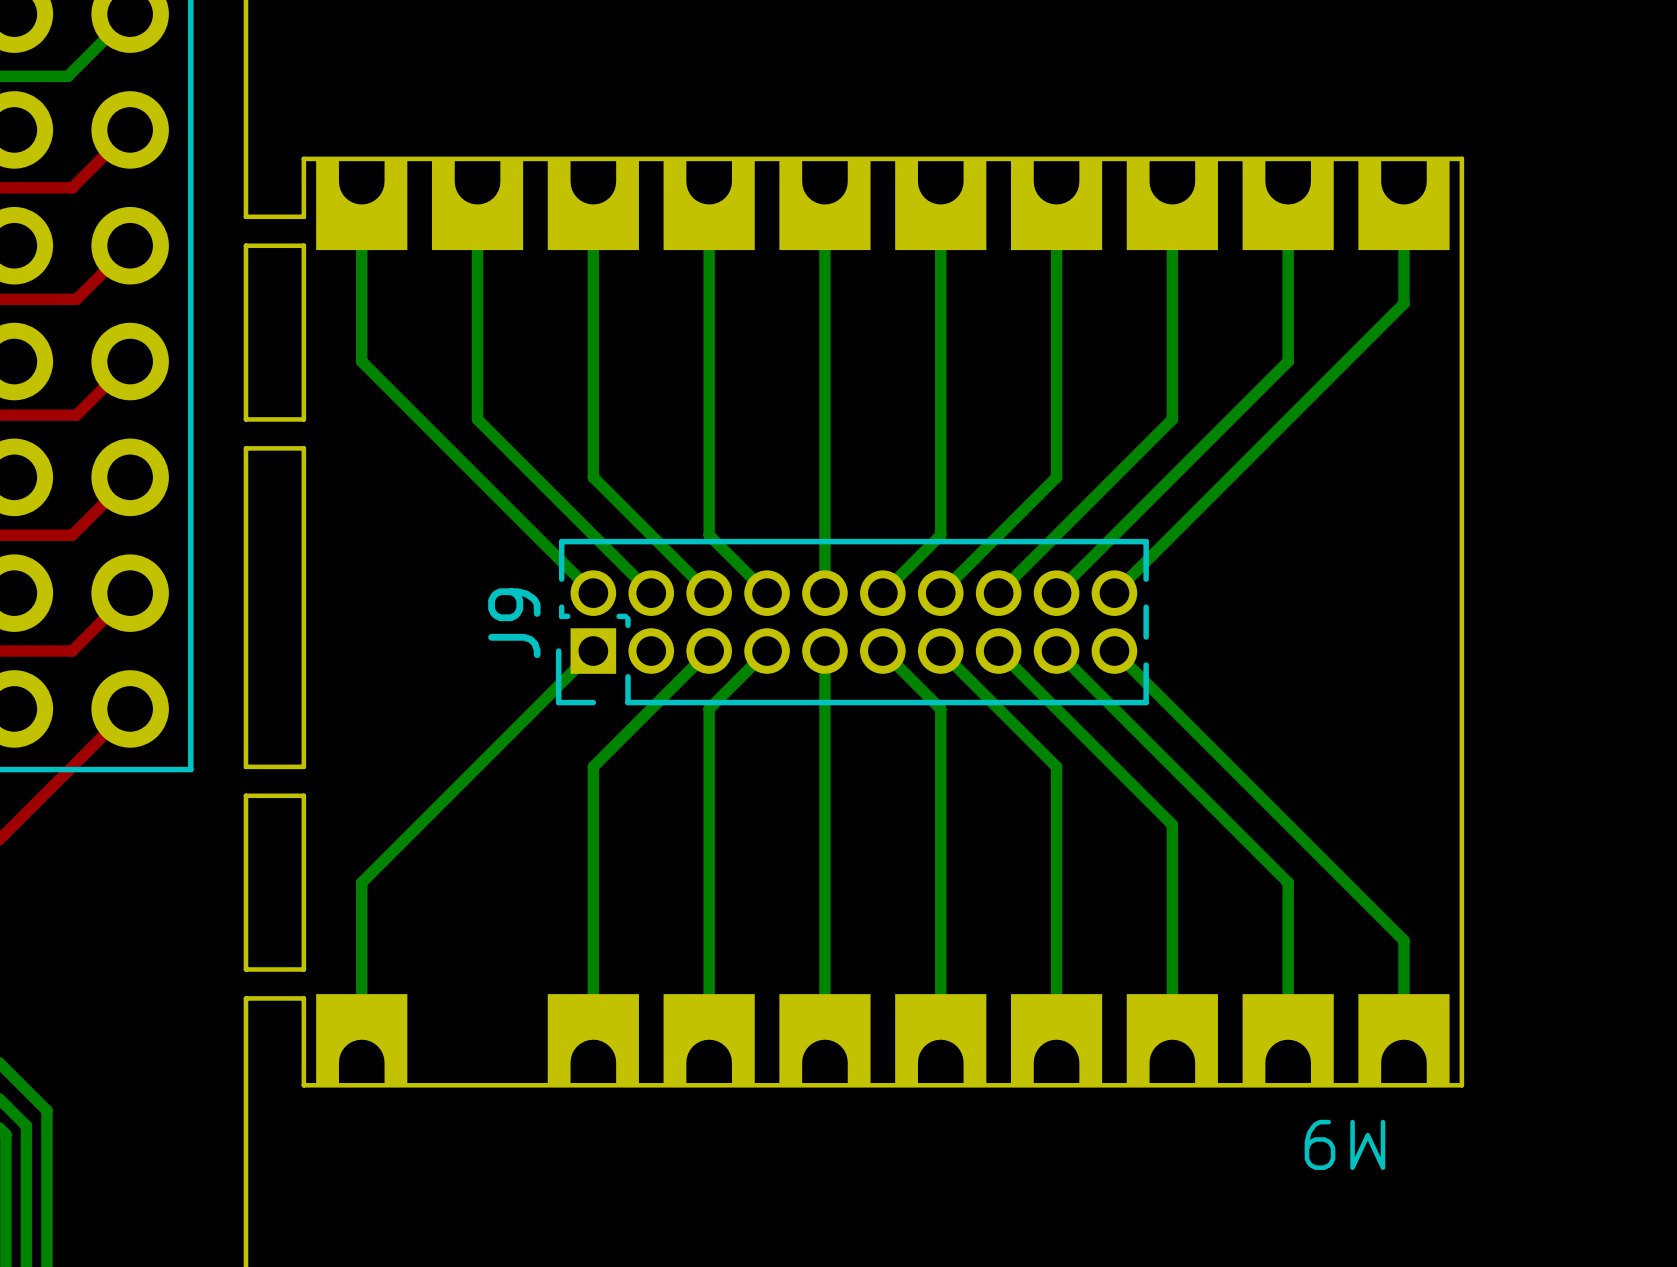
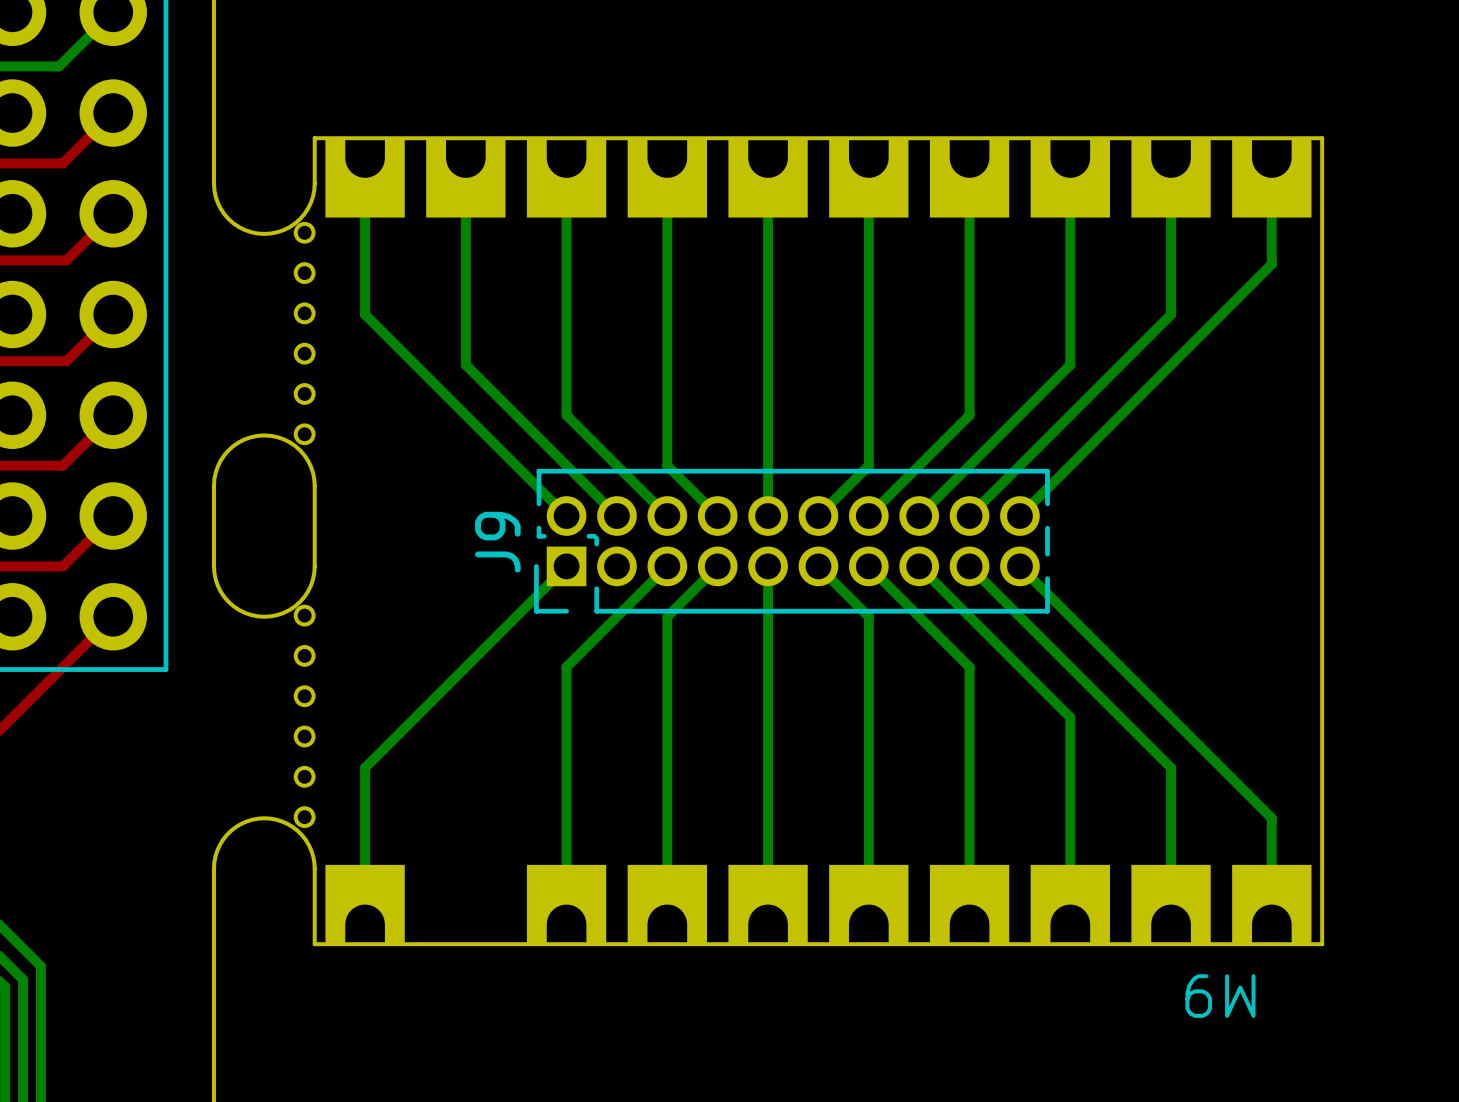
board edge: (361, 158) (303, 158) (303, 216) (245, 216) (245, 211) -> (314, 138) (313, 196) (304, 214) (295, 223) (283, 230) (264, 233) (251, 232) (239, 227) (228, 219) (220, 208) (215, 196) (213, 183)
bottom track: (361, 158) (361, 361) (593, 593) -> none
bottom track: (477, 158) (477, 419) -> (365, 138) (365, 314) (415, 364)
bottom track: (593, 158) (593, 477) -> (465, 138) (465, 364) (516, 415)
bottom track: (709, 158) (709, 535) -> (566, 138) (566, 415) (616, 465)
bottom track: (824, 158) (824, 593) -> (667, 138) (667, 465) (717, 516)
bottom track: (940, 158) (940, 535) (882, 593) -> (768, 138) (768, 516)
bottom track: (1056, 158) (1056, 477) (998, 535) -> (868, 138) (868, 465)
bottom track: (1172, 158) (1172, 419) (1114, 477) -> (969, 138) (969, 415)
bottom track: (1288, 158) (1288, 361) (1230, 419) -> (1070, 138) (1070, 364)
bottom track: (1403, 158) (1403, 303) (1346, 361) -> (1171, 138) (1171, 314)
board edge: (1461, 158) (1461, 1085) -> (1271, 138) (1322, 138) (1322, 944) (1271, 944)
bottom track: none -> (1271, 138) (1271, 264) (1019, 516)
board edge: (245, 245) (245, 419) (303, 419) (303, 245) (245, 245) -> none
round board edge: none -> [293, 221, 316, 244]
round board edge: none -> [293, 262, 316, 284]
round board edge: none -> [293, 302, 316, 325]
round board edge: none -> [293, 342, 316, 365]
round board edge: none -> [293, 383, 316, 405]
round board edge: none -> [293, 423, 316, 446]
board edge: (245, 558) (245, 448) (303, 448) (303, 766) (245, 766) (245, 651) -> (213, 485) (217, 466) (228, 450) (245, 439) (264, 435) (283, 439) (299, 450) (310, 466) (314, 485) (314, 572) (307, 591) (295, 606) (283, 612) (270, 616) (257, 616) (245, 612) (233, 606) (224, 597) (217, 585) (213, 566)
J9 position: (852, 622) -> (791, 541)
M9 position: (882, 622) -> (818, 541)
bottom track: (593, 651) (361, 882) (361, 1085) -> (566, 566) (365, 767) (365, 944)
bottom track: (709, 651) (593, 766) (593, 1085) -> none
bottom track: (824, 651) (824, 1085) -> (717, 566) (667, 616) (667, 944)
bottom track: (882, 651) (940, 708) (940, 1085) -> (768, 566) (768, 944)
bottom track: none -> (1019, 566) (1271, 818) (1271, 944)
round board edge: none -> [293, 604, 316, 627]
bottom track: (709, 708) (709, 1085) -> (616, 616) (566, 667) (566, 944)
bottom track: (998, 708) (1056, 766) (1056, 1085) -> (868, 616) (868, 944)
round board edge: none -> [293, 645, 316, 667]
bottom track: (1114, 766) (1172, 824) (1172, 1085) -> (969, 667) (969, 944)
round board edge: none -> [293, 685, 316, 708]
board edge: (245, 795) (245, 969) (303, 969) (303, 795) (245, 795) -> none
bottom track: (1230, 824) (1288, 882) (1288, 1085) -> (1070, 717) (1070, 944)
round board edge: none -> [293, 725, 316, 748]
round board edge: none -> [293, 765, 316, 788]
bottom track: (1346, 882) (1403, 940) (1403, 1085) -> (1171, 767) (1171, 944)
round board edge: none -> [293, 806, 316, 829]
board edge: (245, 998) (303, 998) (303, 1085) (361, 1085) -> (213, 868) (219, 845) (230, 830) (240, 824) (252, 819) (270, 818) (292, 827) (305, 840) (313, 856) (314, 944)

